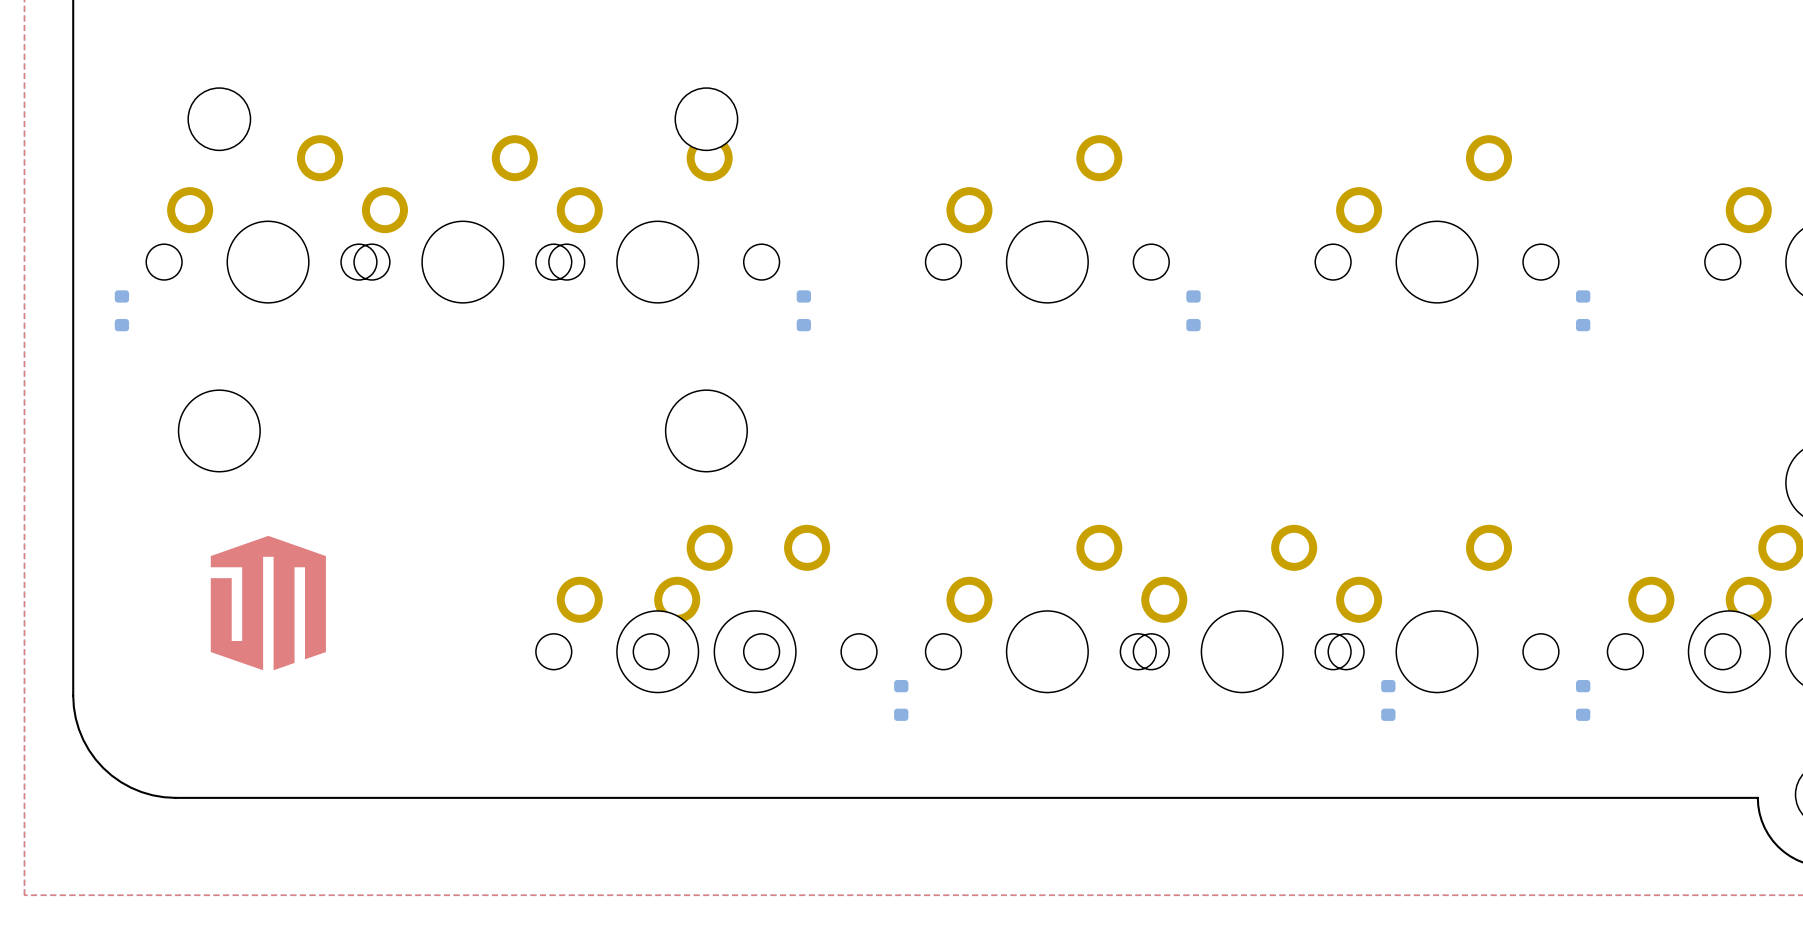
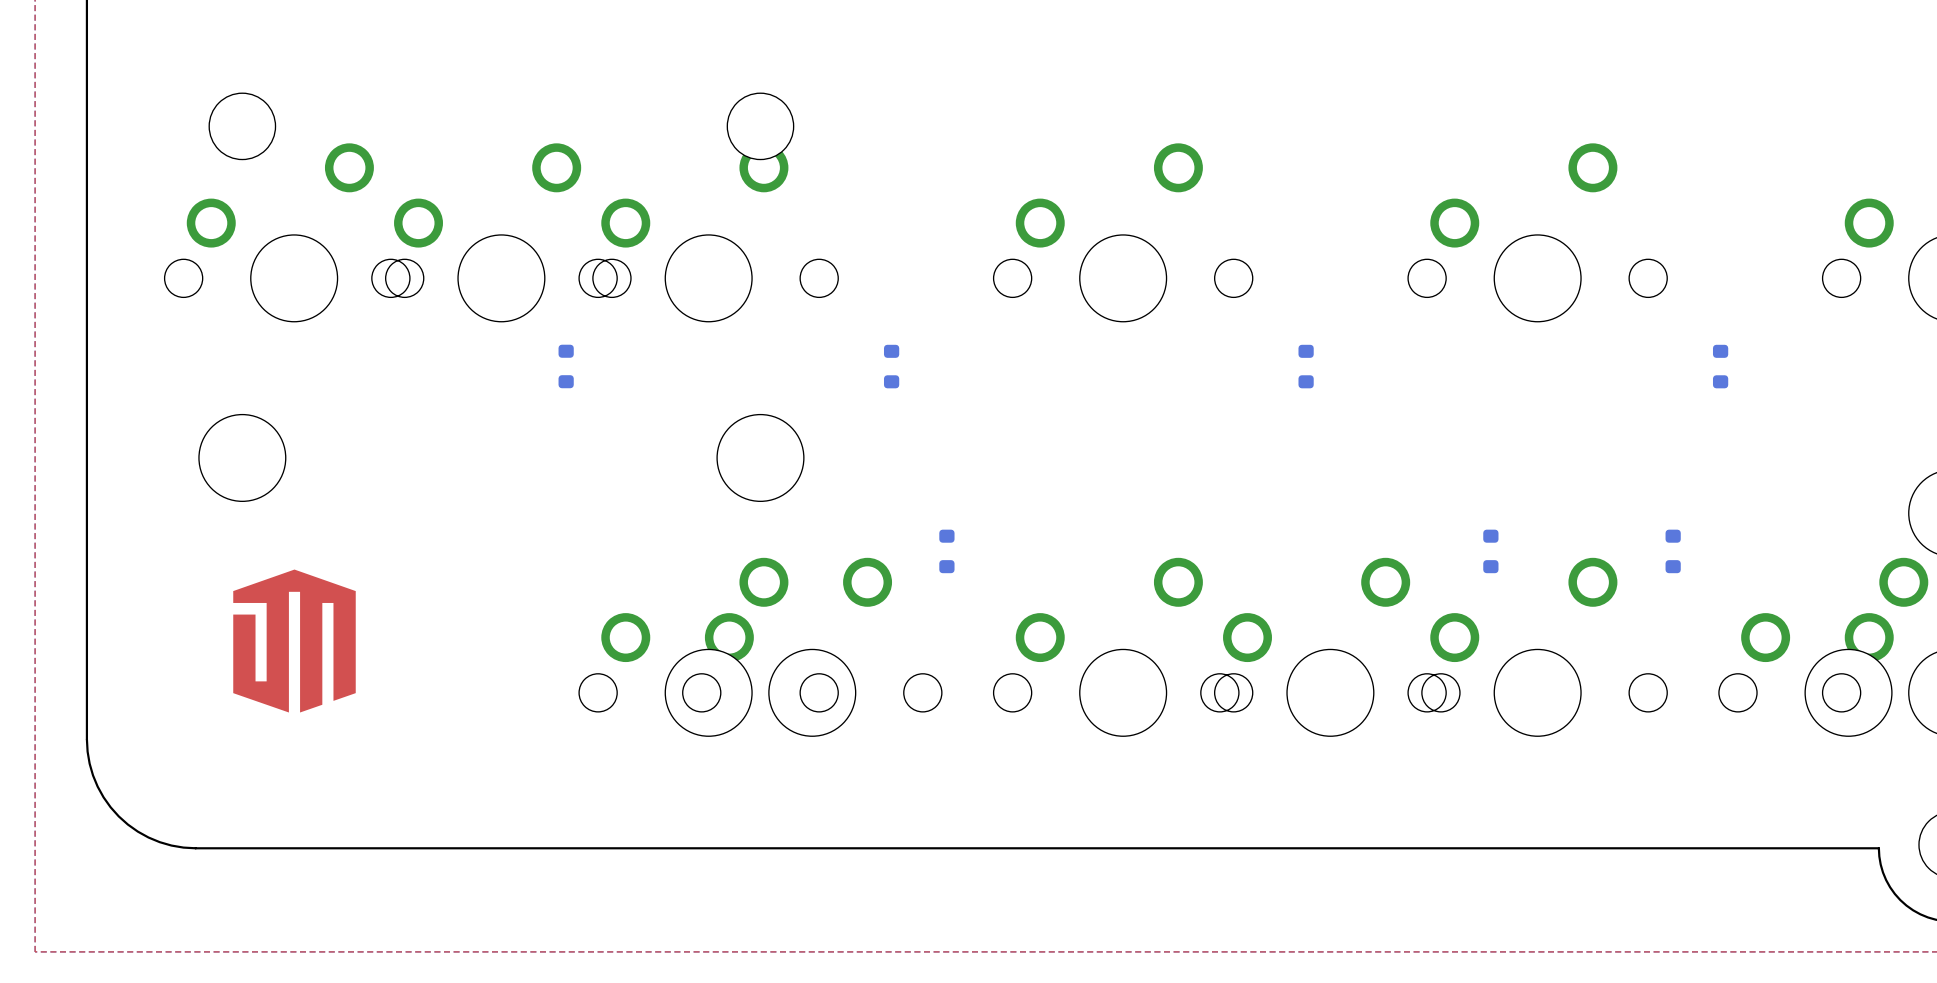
part: (121, 310) -> none
part position: (803, 310) -> (891, 366)
part position: (1193, 310) -> (1306, 366)
part position: (1583, 310) -> (1720, 366)
part: none -> (566, 366)
part: none -> (946, 551)
part: none -> (1490, 551)
part: none -> (1673, 551)
part: (901, 700) -> none
part: (1388, 700) -> none
part: (1583, 700) -> none

